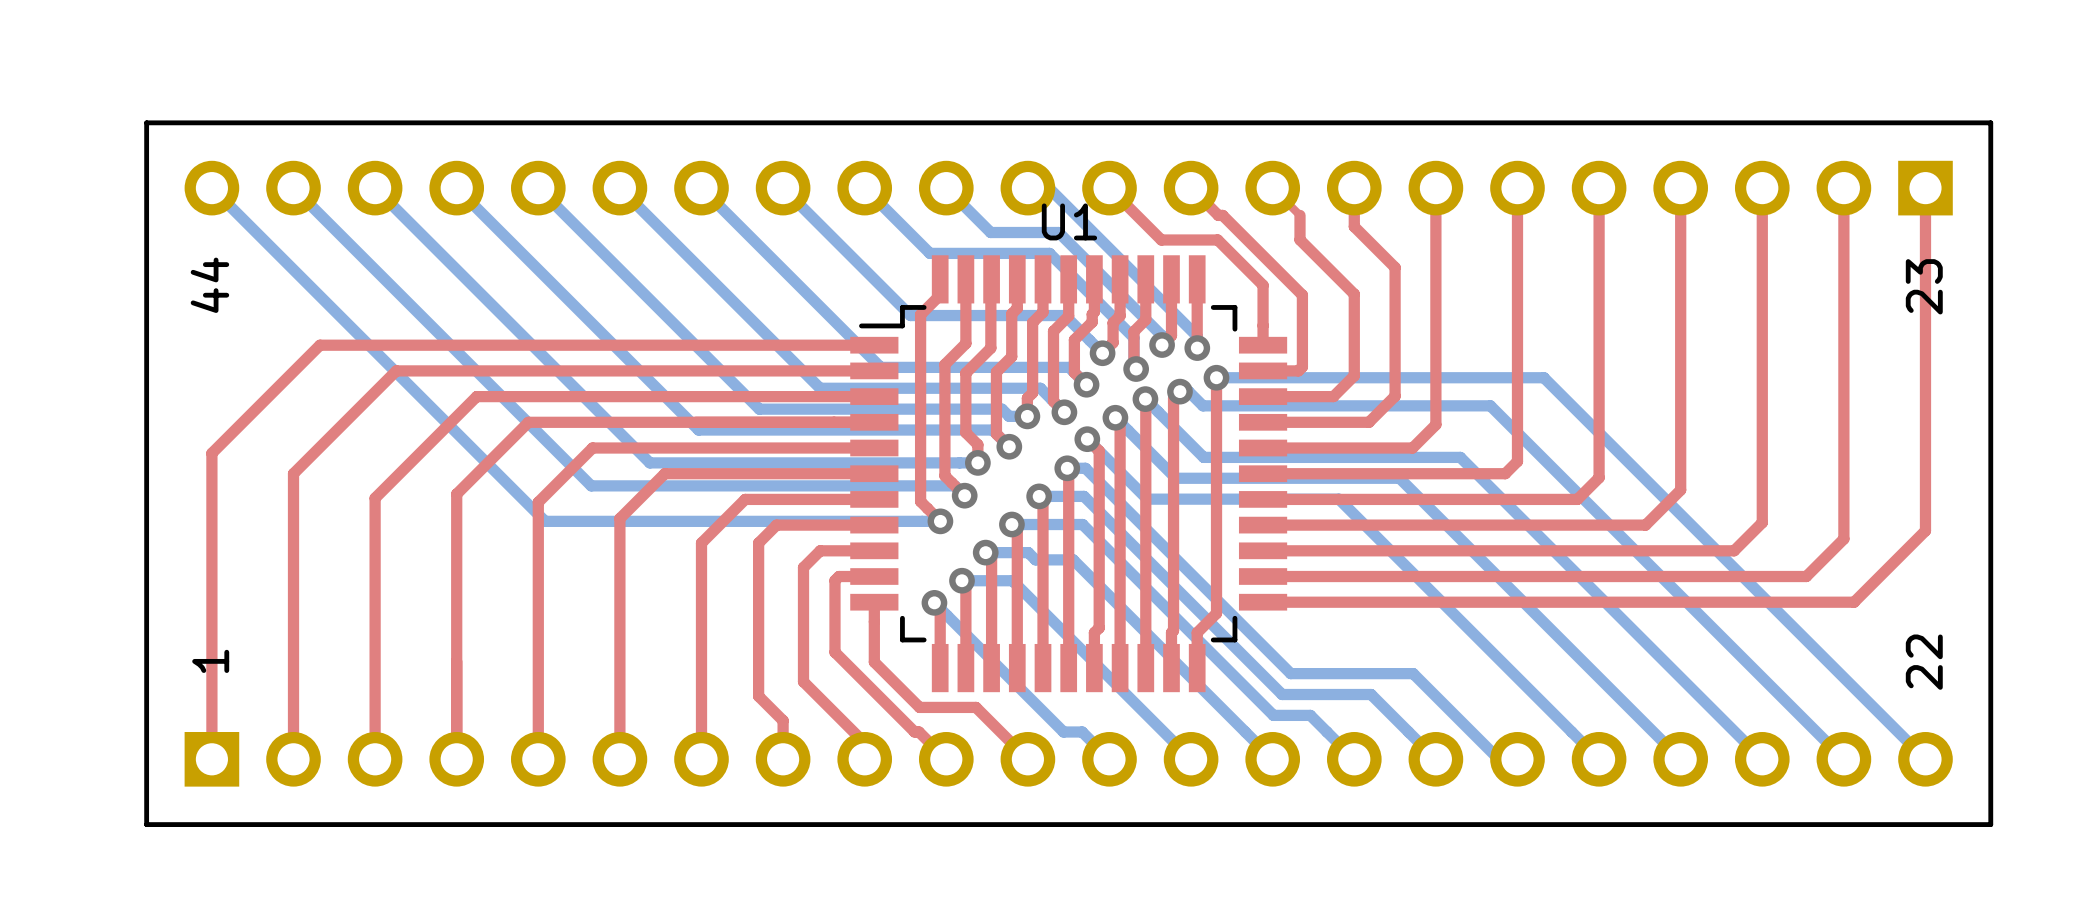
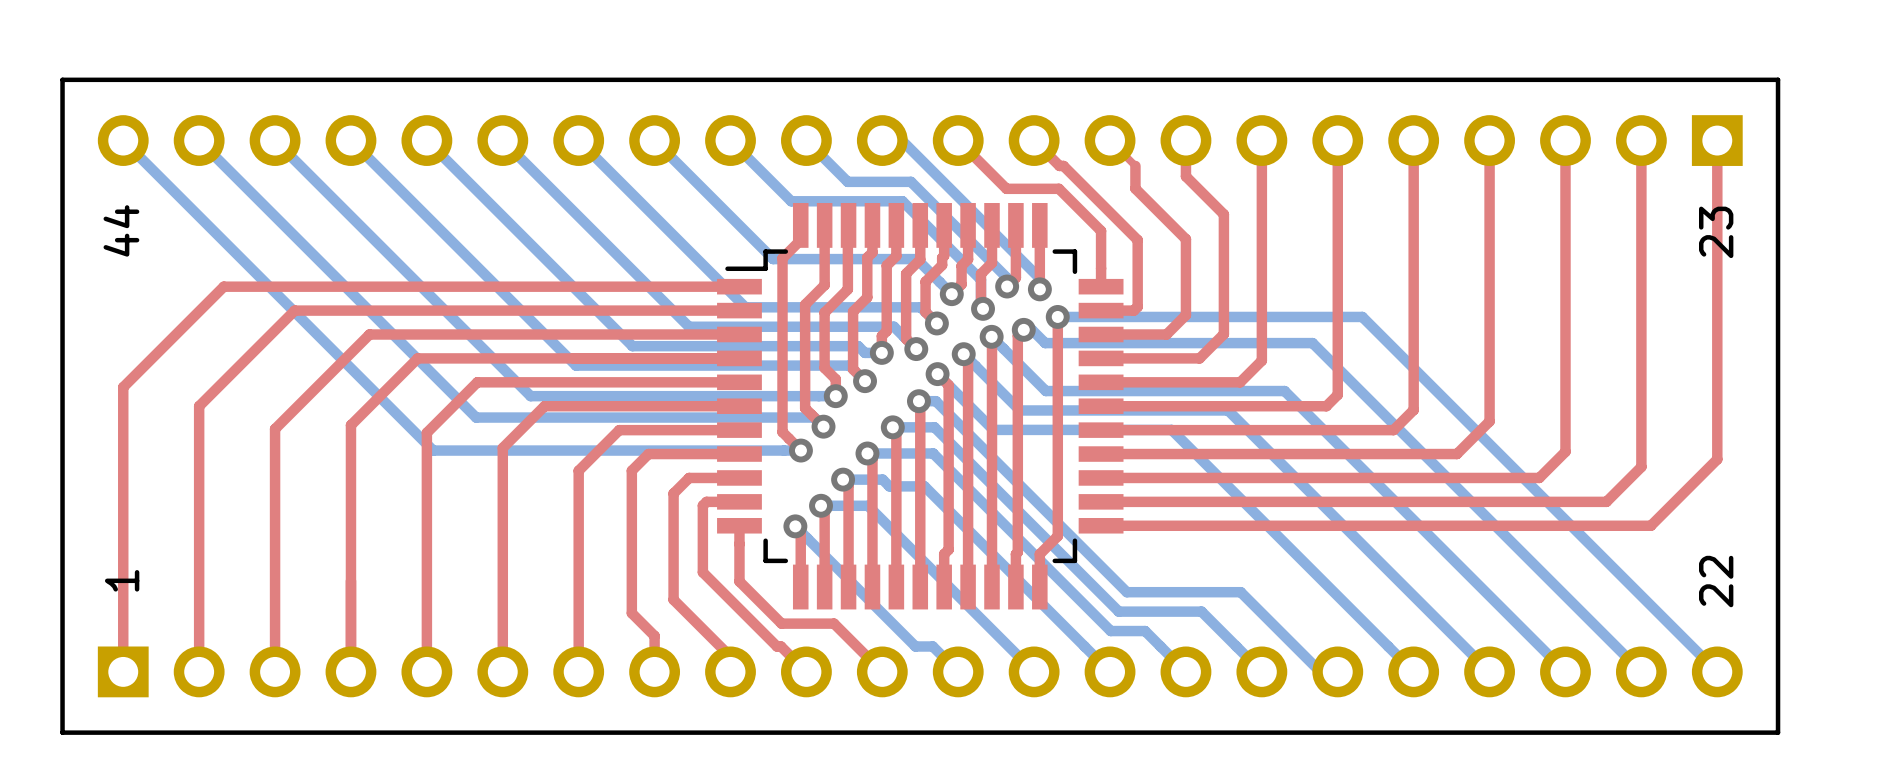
U1 name: U1 (1069, 221) -> none

